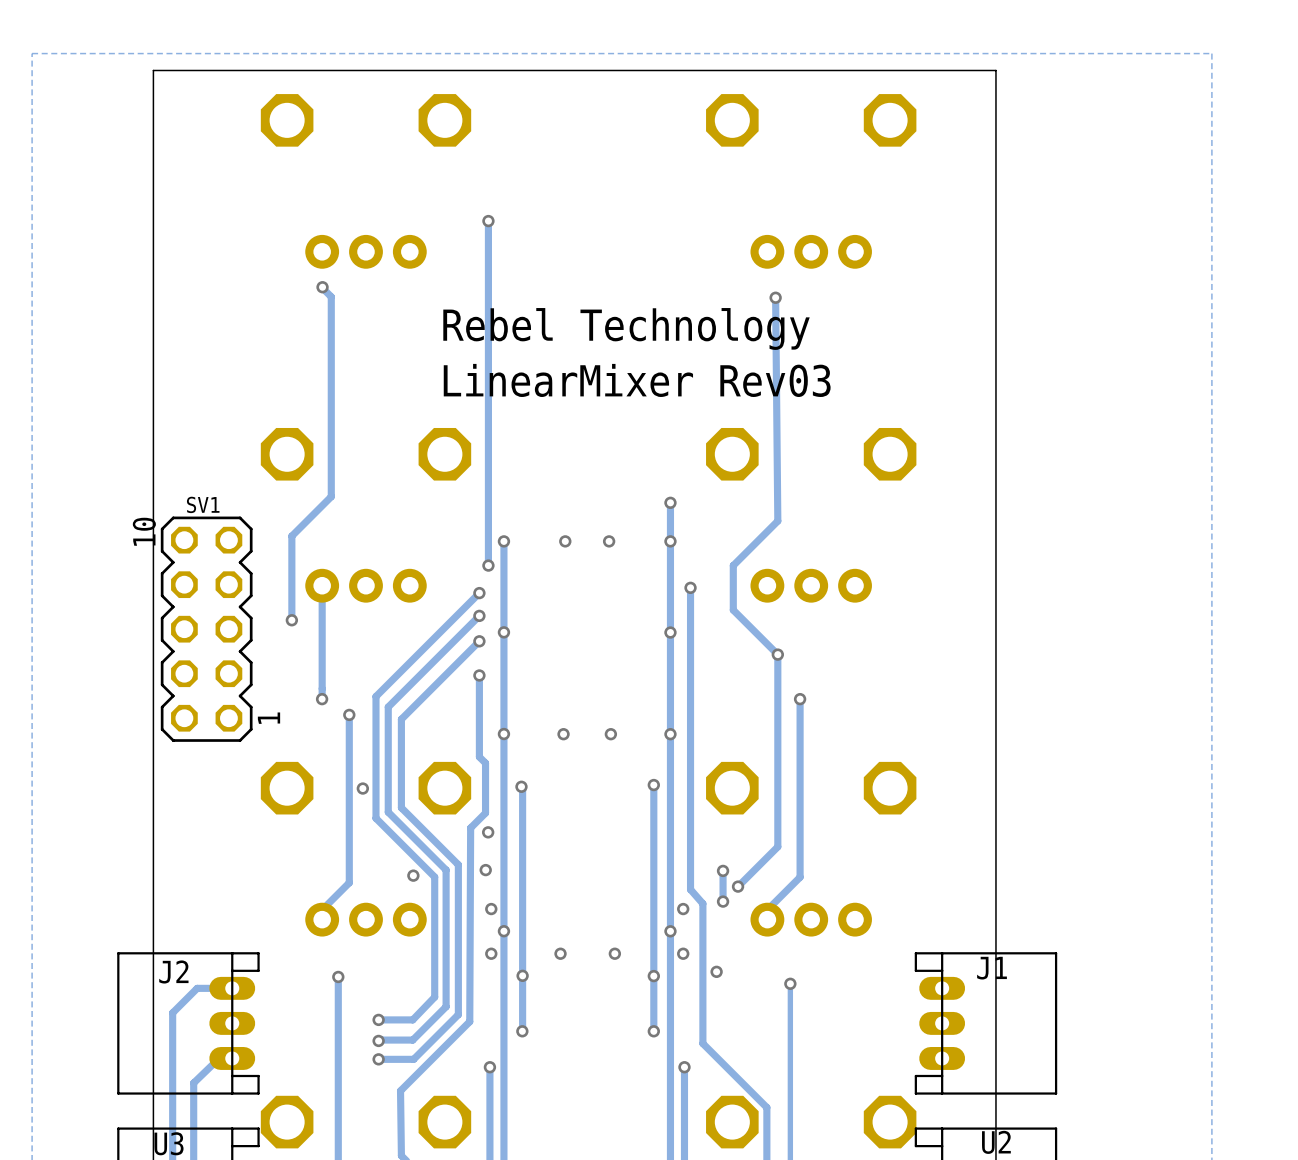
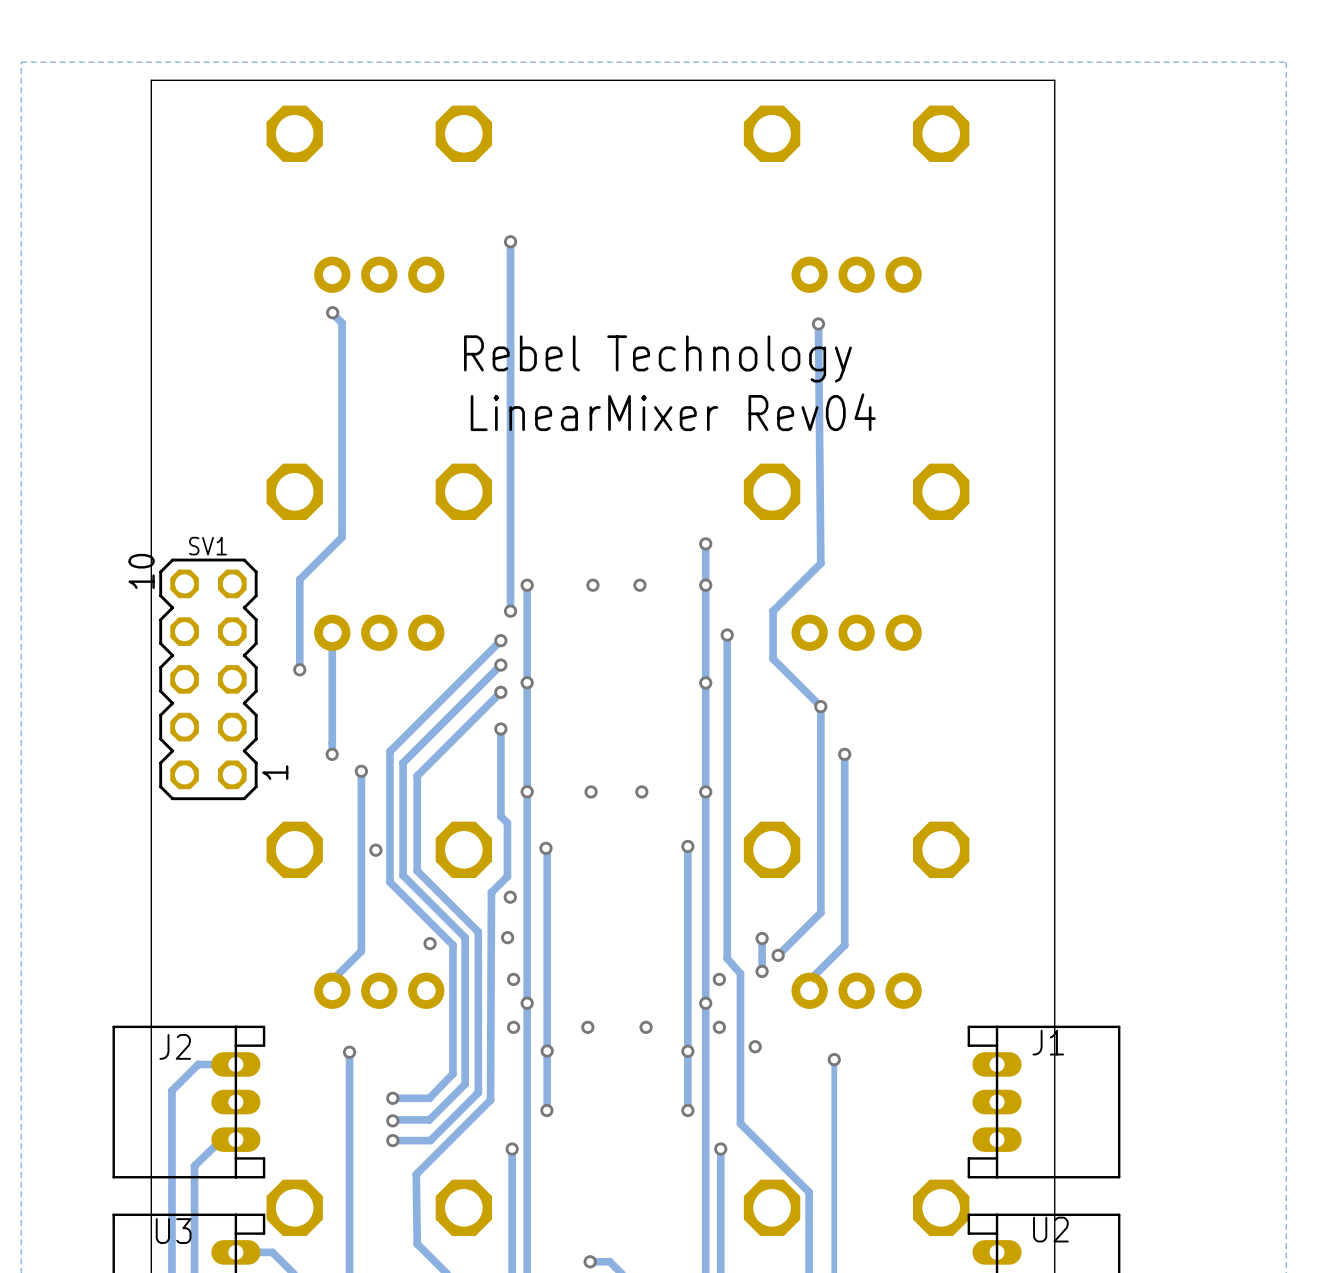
text: LinearMixer Rev03 (637, 380) -> LinearMixer Rev04 (673, 412)

